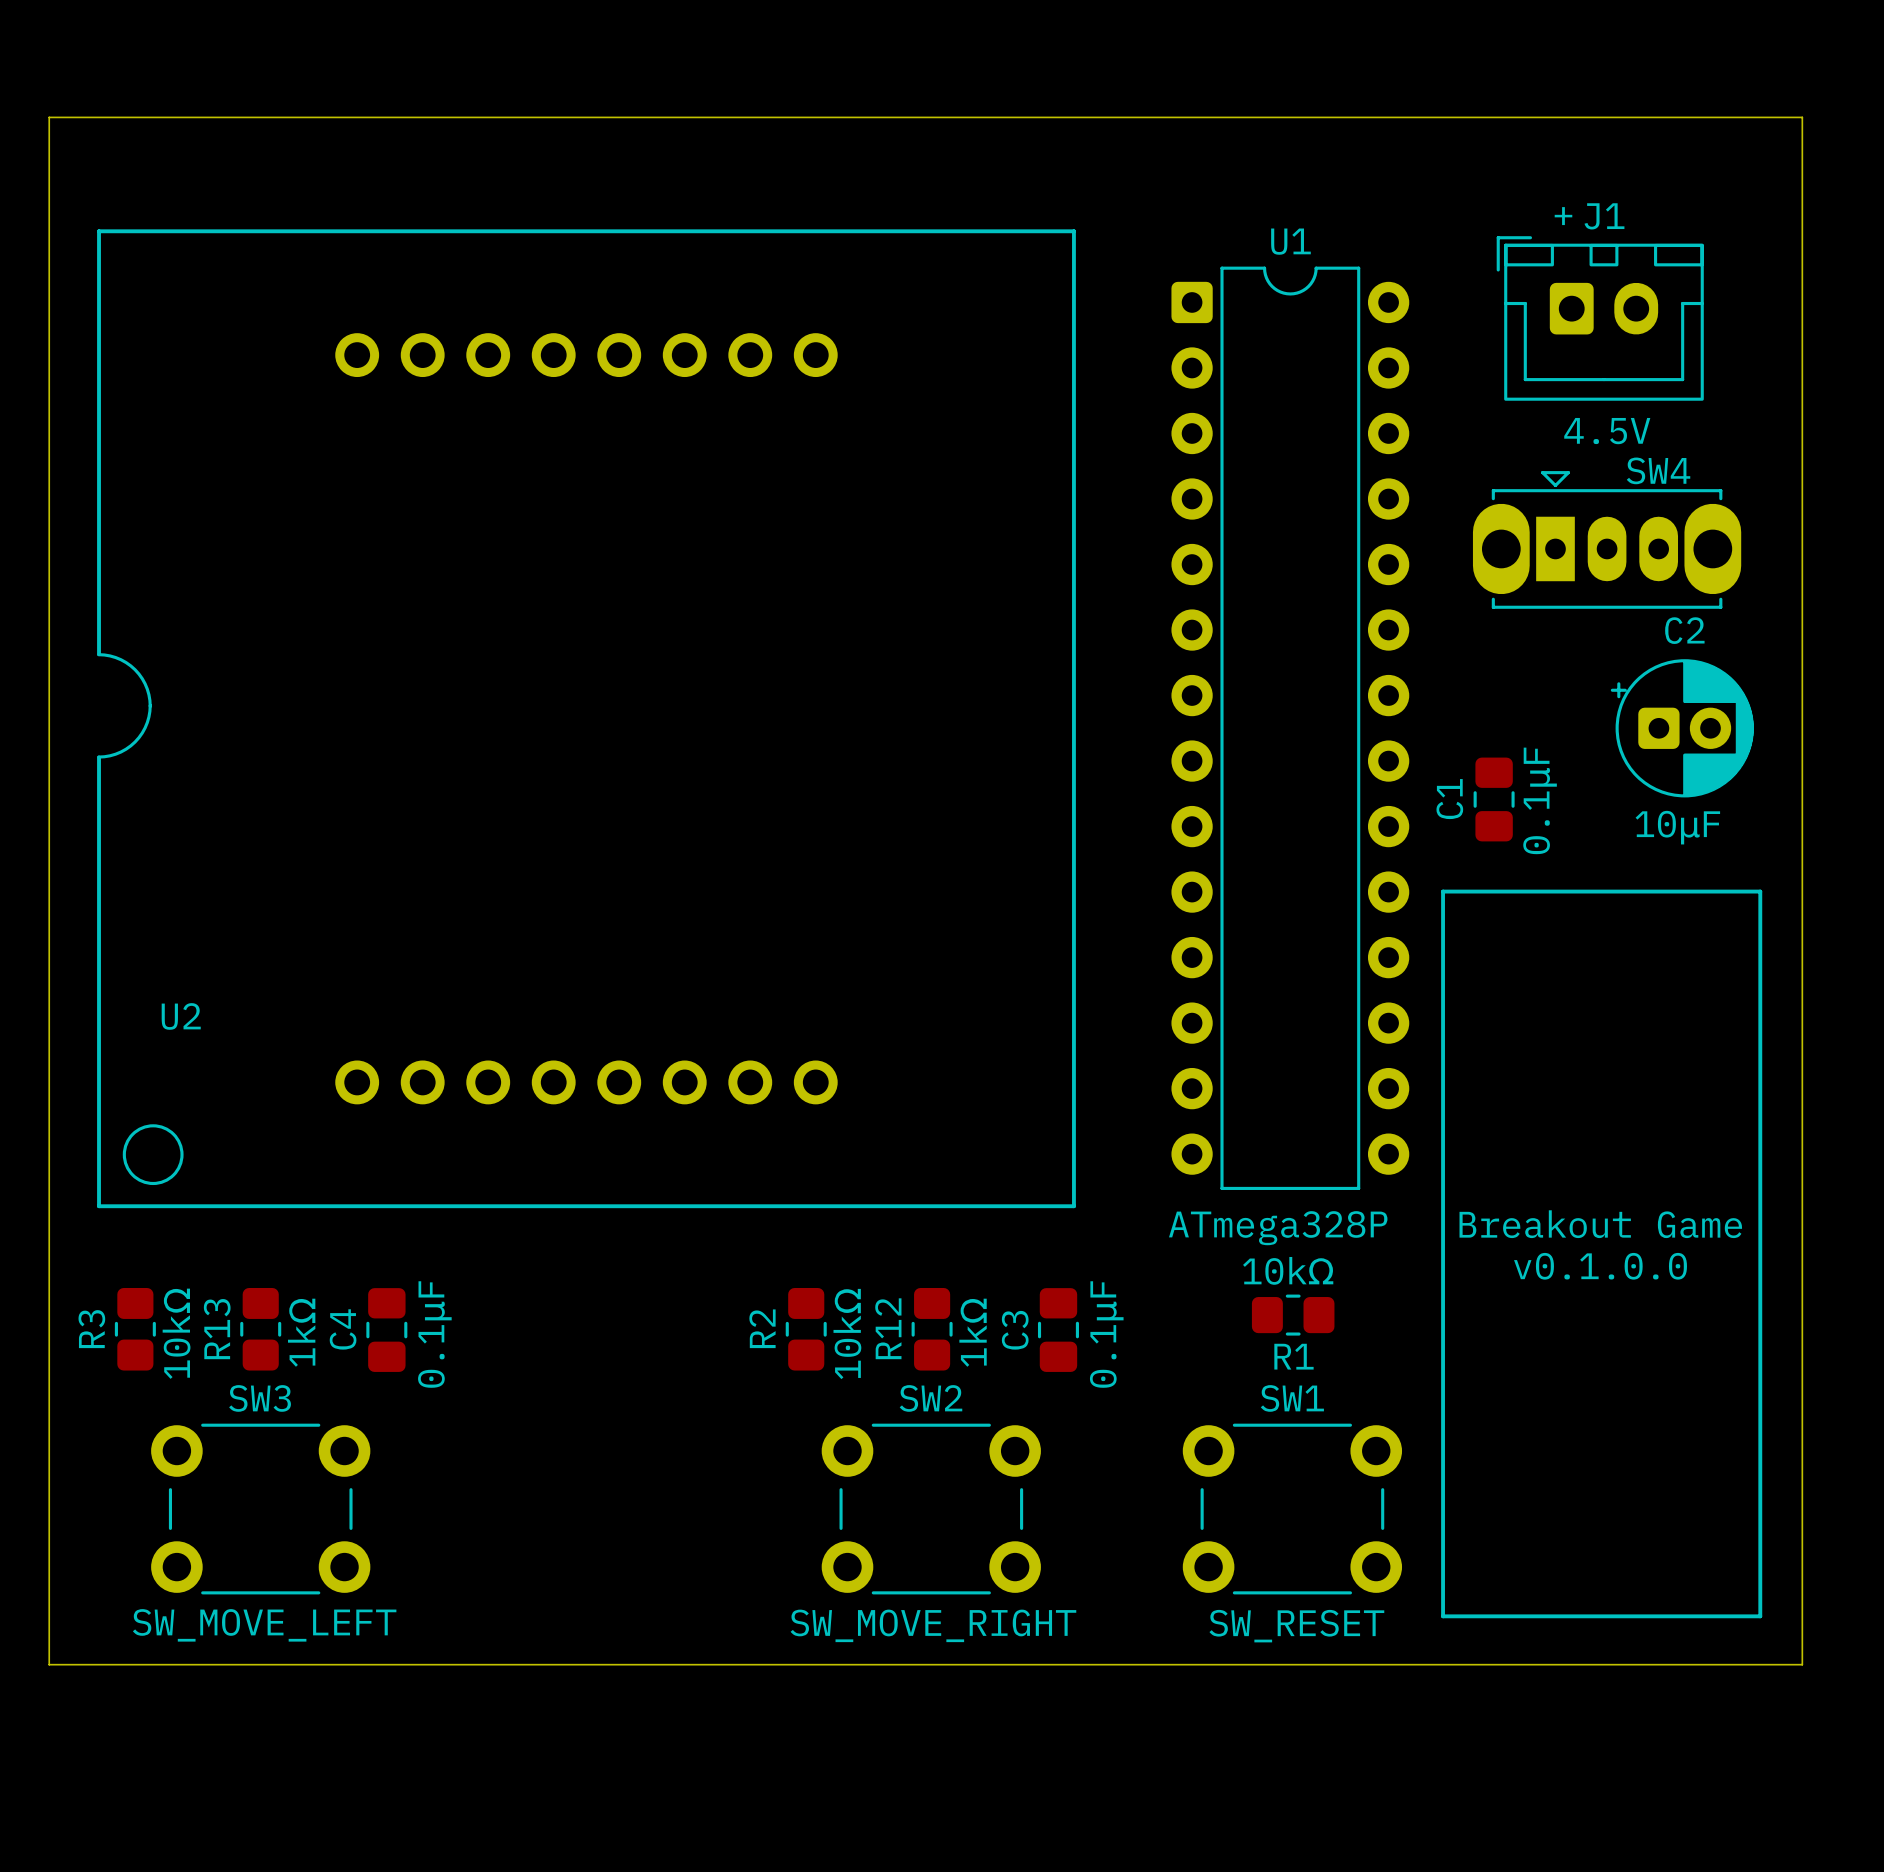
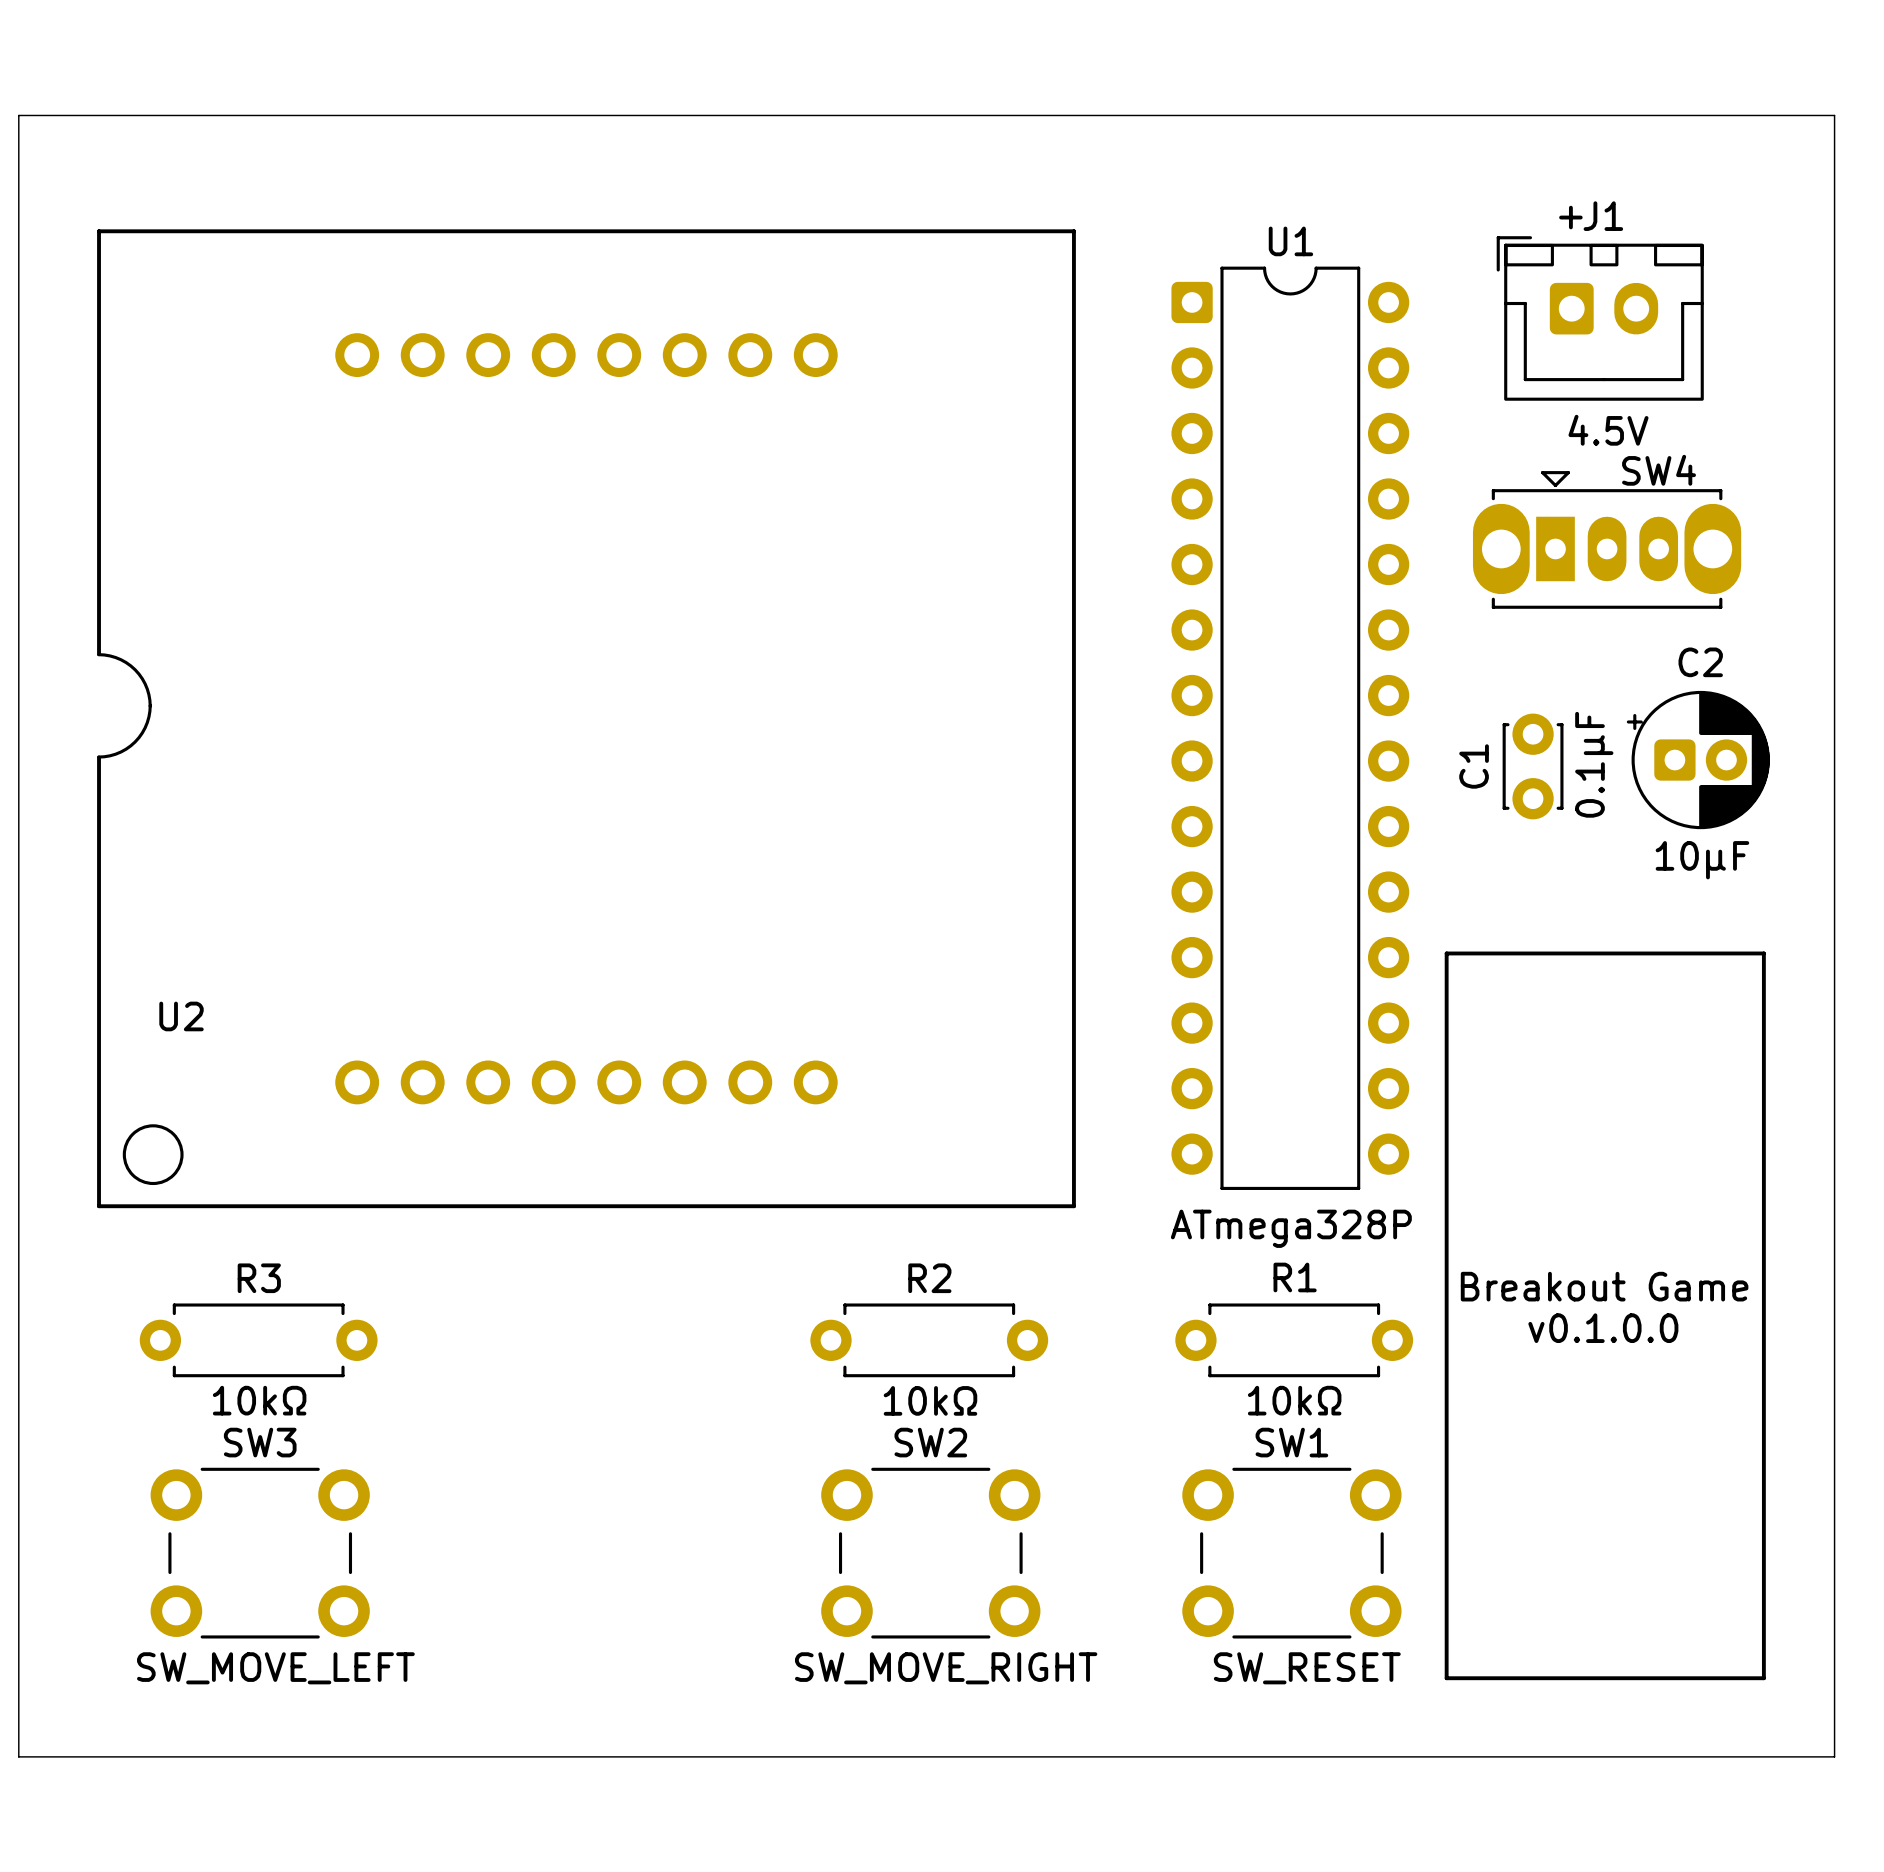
board edge: (49, 117) (1802, 117) (1802, 1664) (49, 1664) (49, 117) -> (18, 115) (18, 1756) (1834, 1756) (1834, 115) (18, 115)
C2 position: (1682, 728) -> (1698, 760)
C1 footprint: [1473, 757, 1515, 842] -> [1502, 713, 1564, 820]
text position: 0.1μF (1540, 800) -> 0.1μF (1594, 764)
text position: 10μF (1677, 827) -> 10μF (1702, 860)
line: (1443, 891) (1760, 891) (1760, 1616) (1443, 1616) (1443, 891) -> (1446, 953) (1763, 953) (1763, 1678) (1446, 1678) (1446, 953)
text position: Breakout Game (1600, 1224) -> Breakout Game (1604, 1286)
text position: v0.1.0.0 (1600, 1266) -> v0.1.0.0 (1603, 1328)
text position: 10kΩ (1288, 1270) -> 10kΩ (1294, 1400)
R3 footprint: [114, 1287, 156, 1371] -> [139, 1303, 378, 1378]
R2 footprint: [785, 1287, 827, 1371] -> [810, 1303, 1049, 1378]
R1 footprint: [1251, 1294, 1335, 1336] -> [1175, 1303, 1414, 1378]
R2 name position: R2 (762, 1328) -> R2 (929, 1278)
R3 name position: R3 (91, 1329) -> R3 (259, 1278)
R13: (260, 1329) -> none
R12: (932, 1329) -> none
C4: (386, 1330) -> none
C3: (1058, 1330) -> none
text: 1kΩ (301, 1332) -> none
text: 1kΩ (973, 1332) -> none
text rotation: 0° (176, 1333) -> 90° clockwise (259, 1400)
text: 0.1μF (434, 1334) -> none
text rotation: 0° (847, 1334) -> 90° clockwise (930, 1400)
text: 0.1μF (1106, 1334) -> none
R1 name position: R1 (1293, 1356) -> R1 (1295, 1277)
SW3 position: (260, 1509) -> (260, 1553)
SW2 position: (931, 1509) -> (930, 1553)
SW1 position: (1292, 1509) -> (1291, 1553)
text position: SW_MOVE_LEFT (264, 1625) -> SW_MOVE_LEFT (275, 1668)
text position: SW_MOVE_RIGHT (933, 1625) -> SW_MOVE_RIGHT (946, 1668)
text position: SW_RESET (1296, 1626) -> SW_RESET (1307, 1668)

